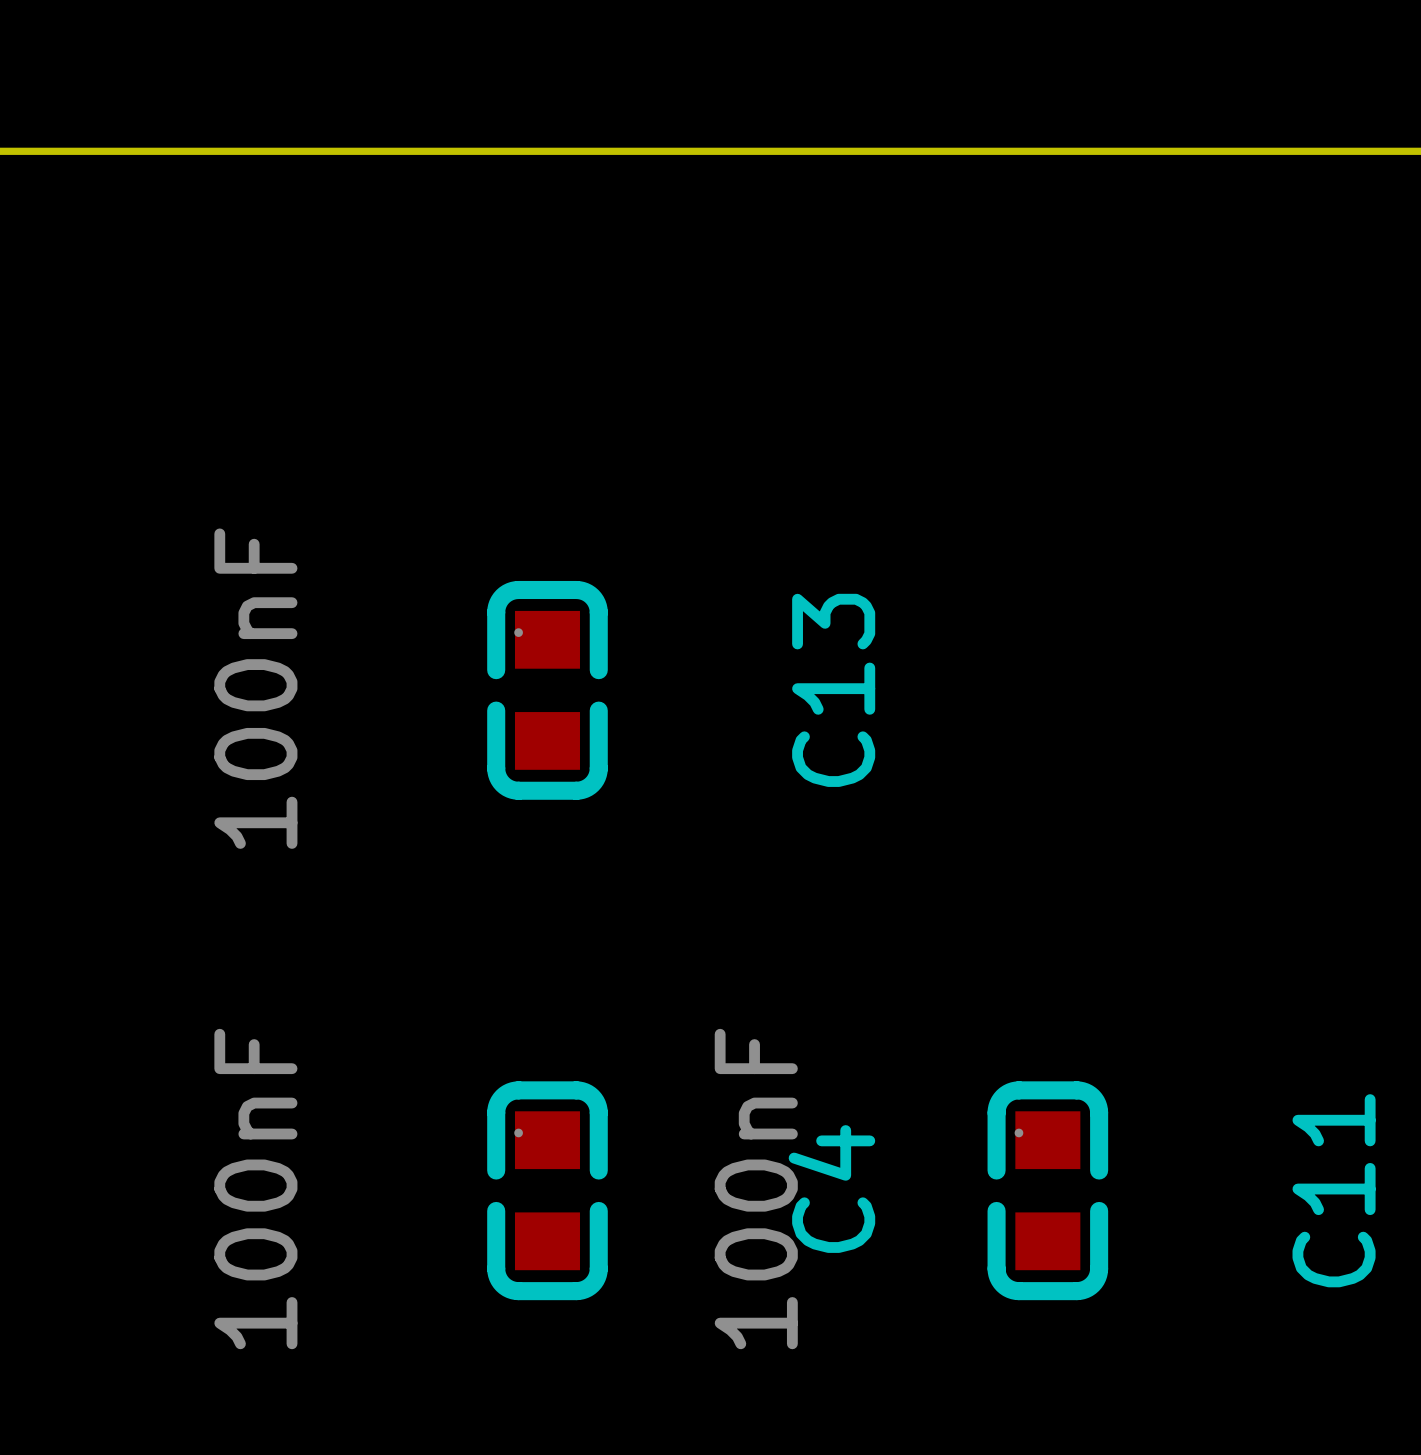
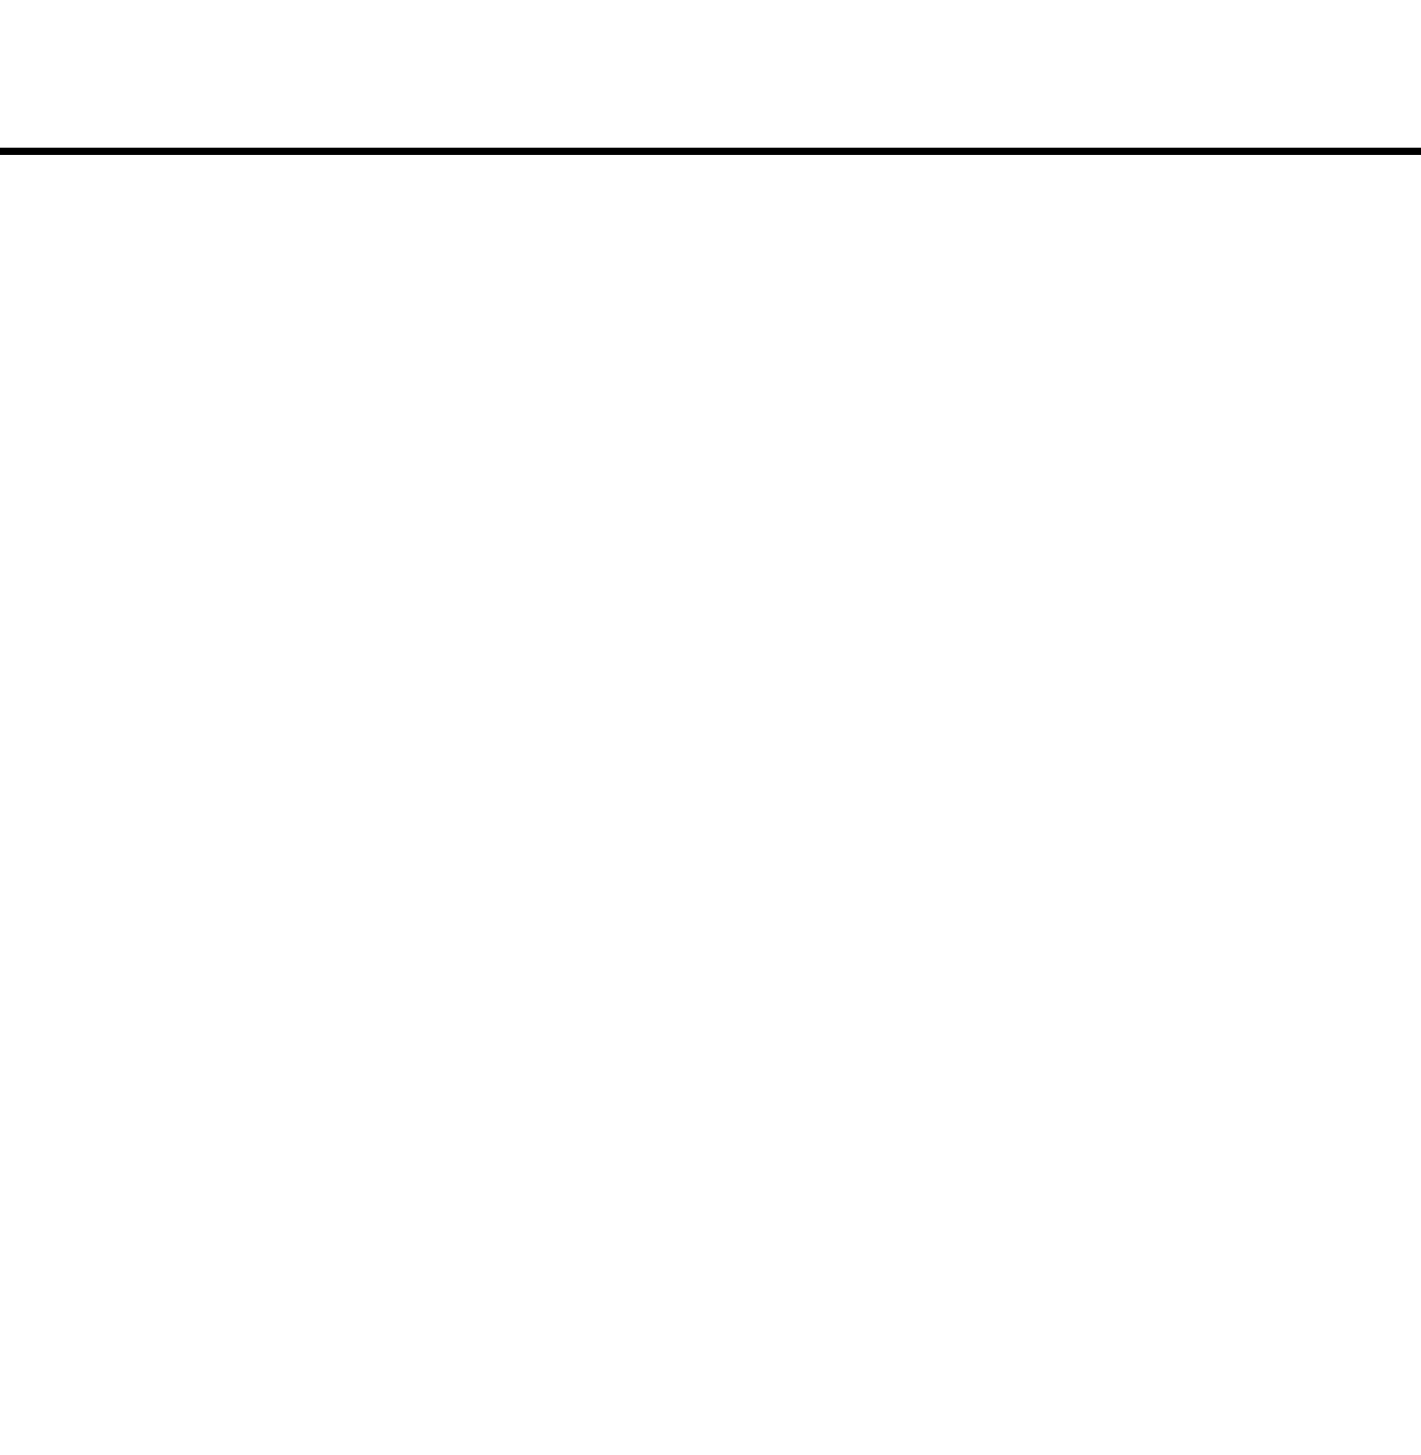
C13: 100nF (547, 690) -> none
C4: 100nF (547, 1190) -> none
C11: 100nF (1047, 1190) -> none

